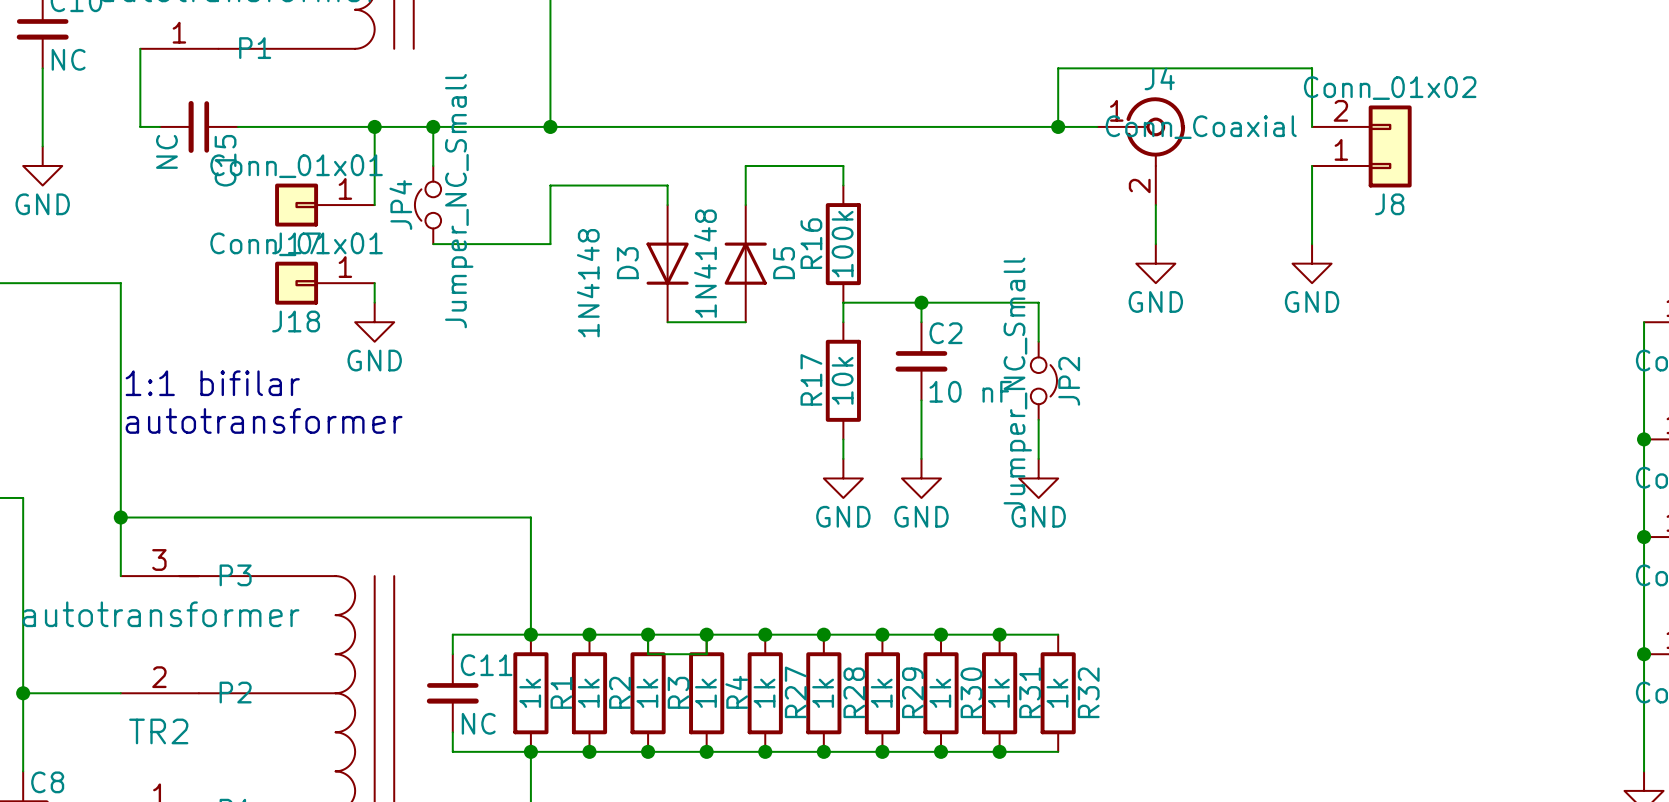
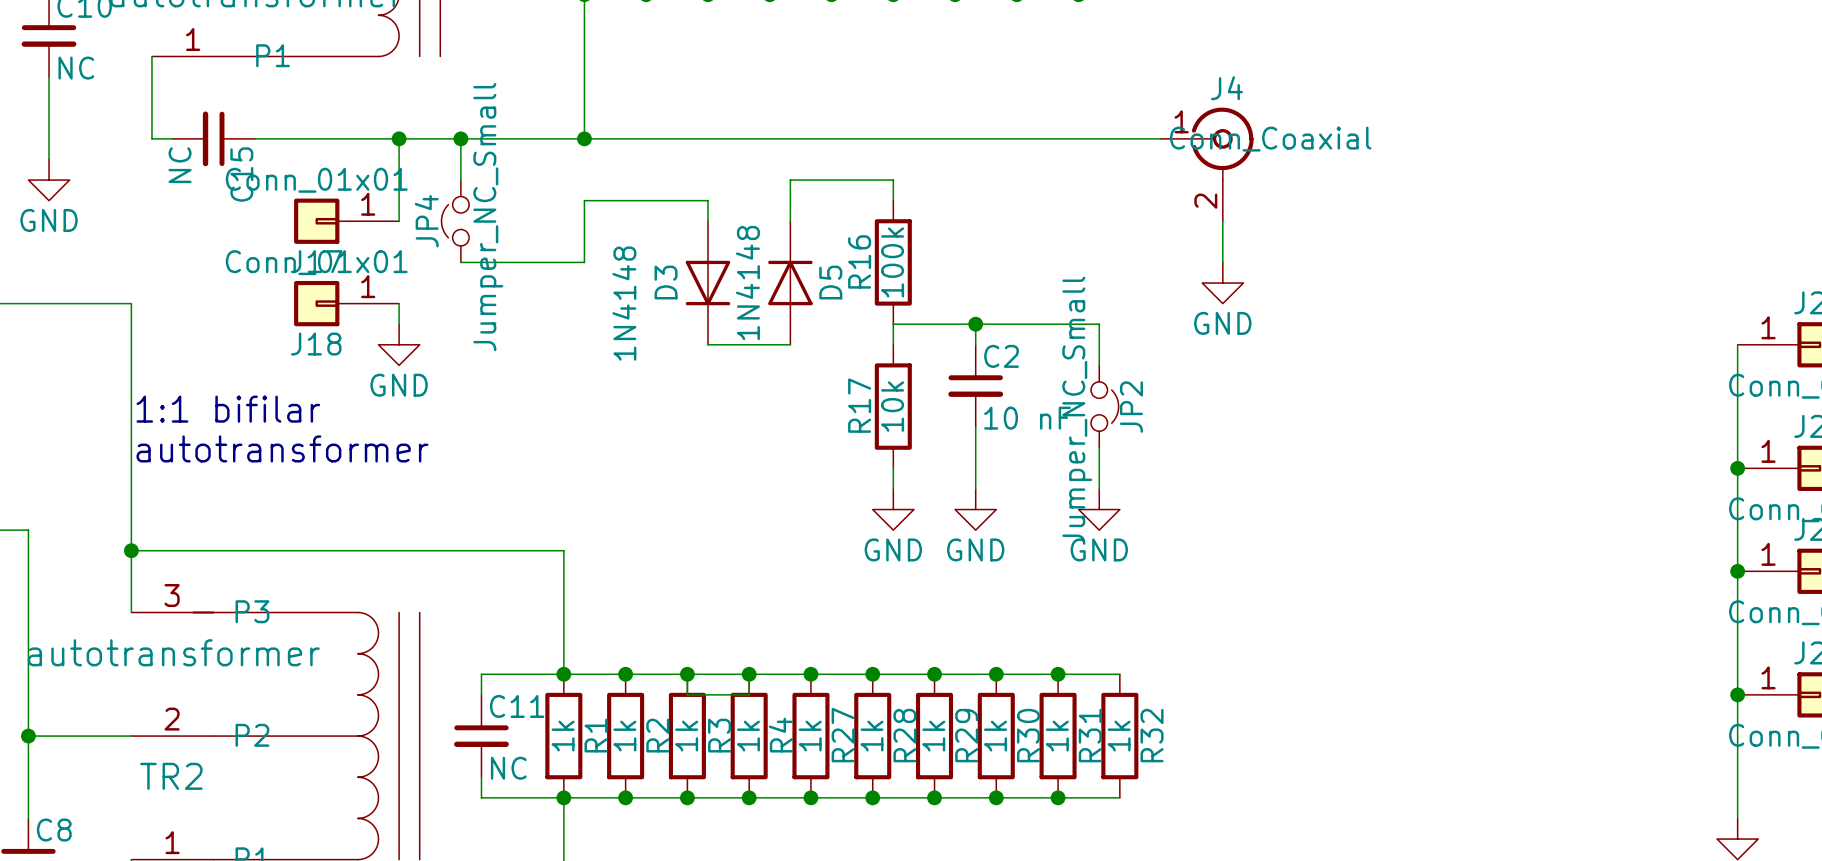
wire: (1058, 126) (1058, 68) (1312, 68) (1312, 126) -> none
junction: (1058, 126) -> none
J8: Conn_01x02 (1361, 146) -> none
wire: (1312, 165) (1312, 244) -> none
power symbol: GND (1312, 263) -> none

